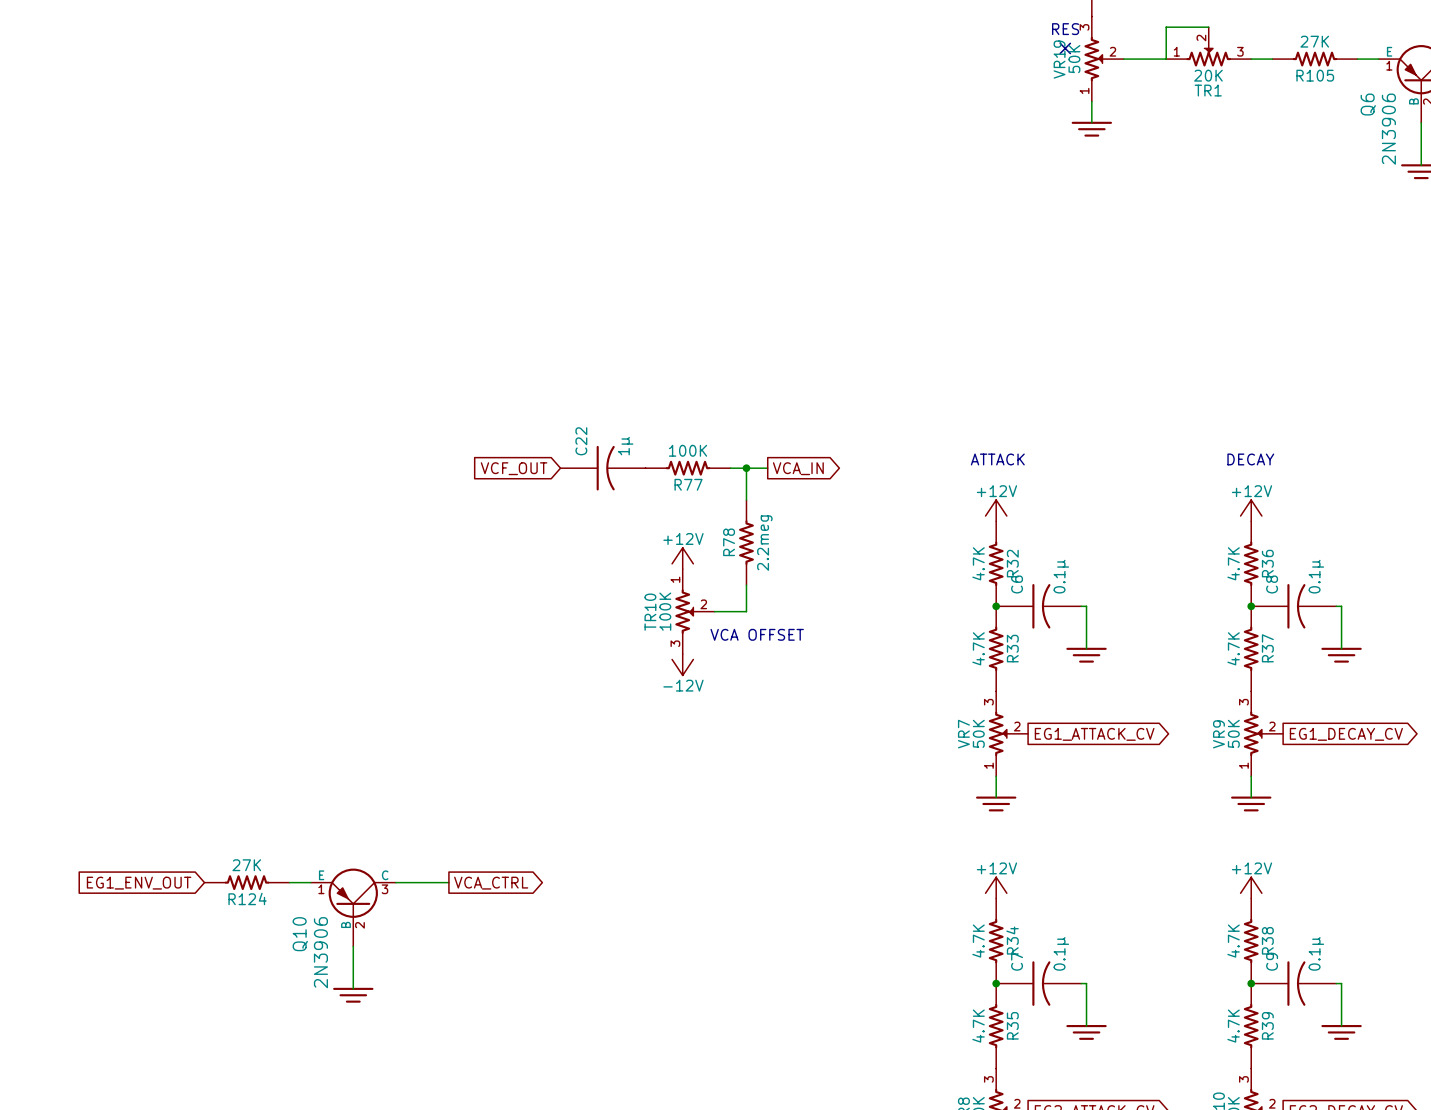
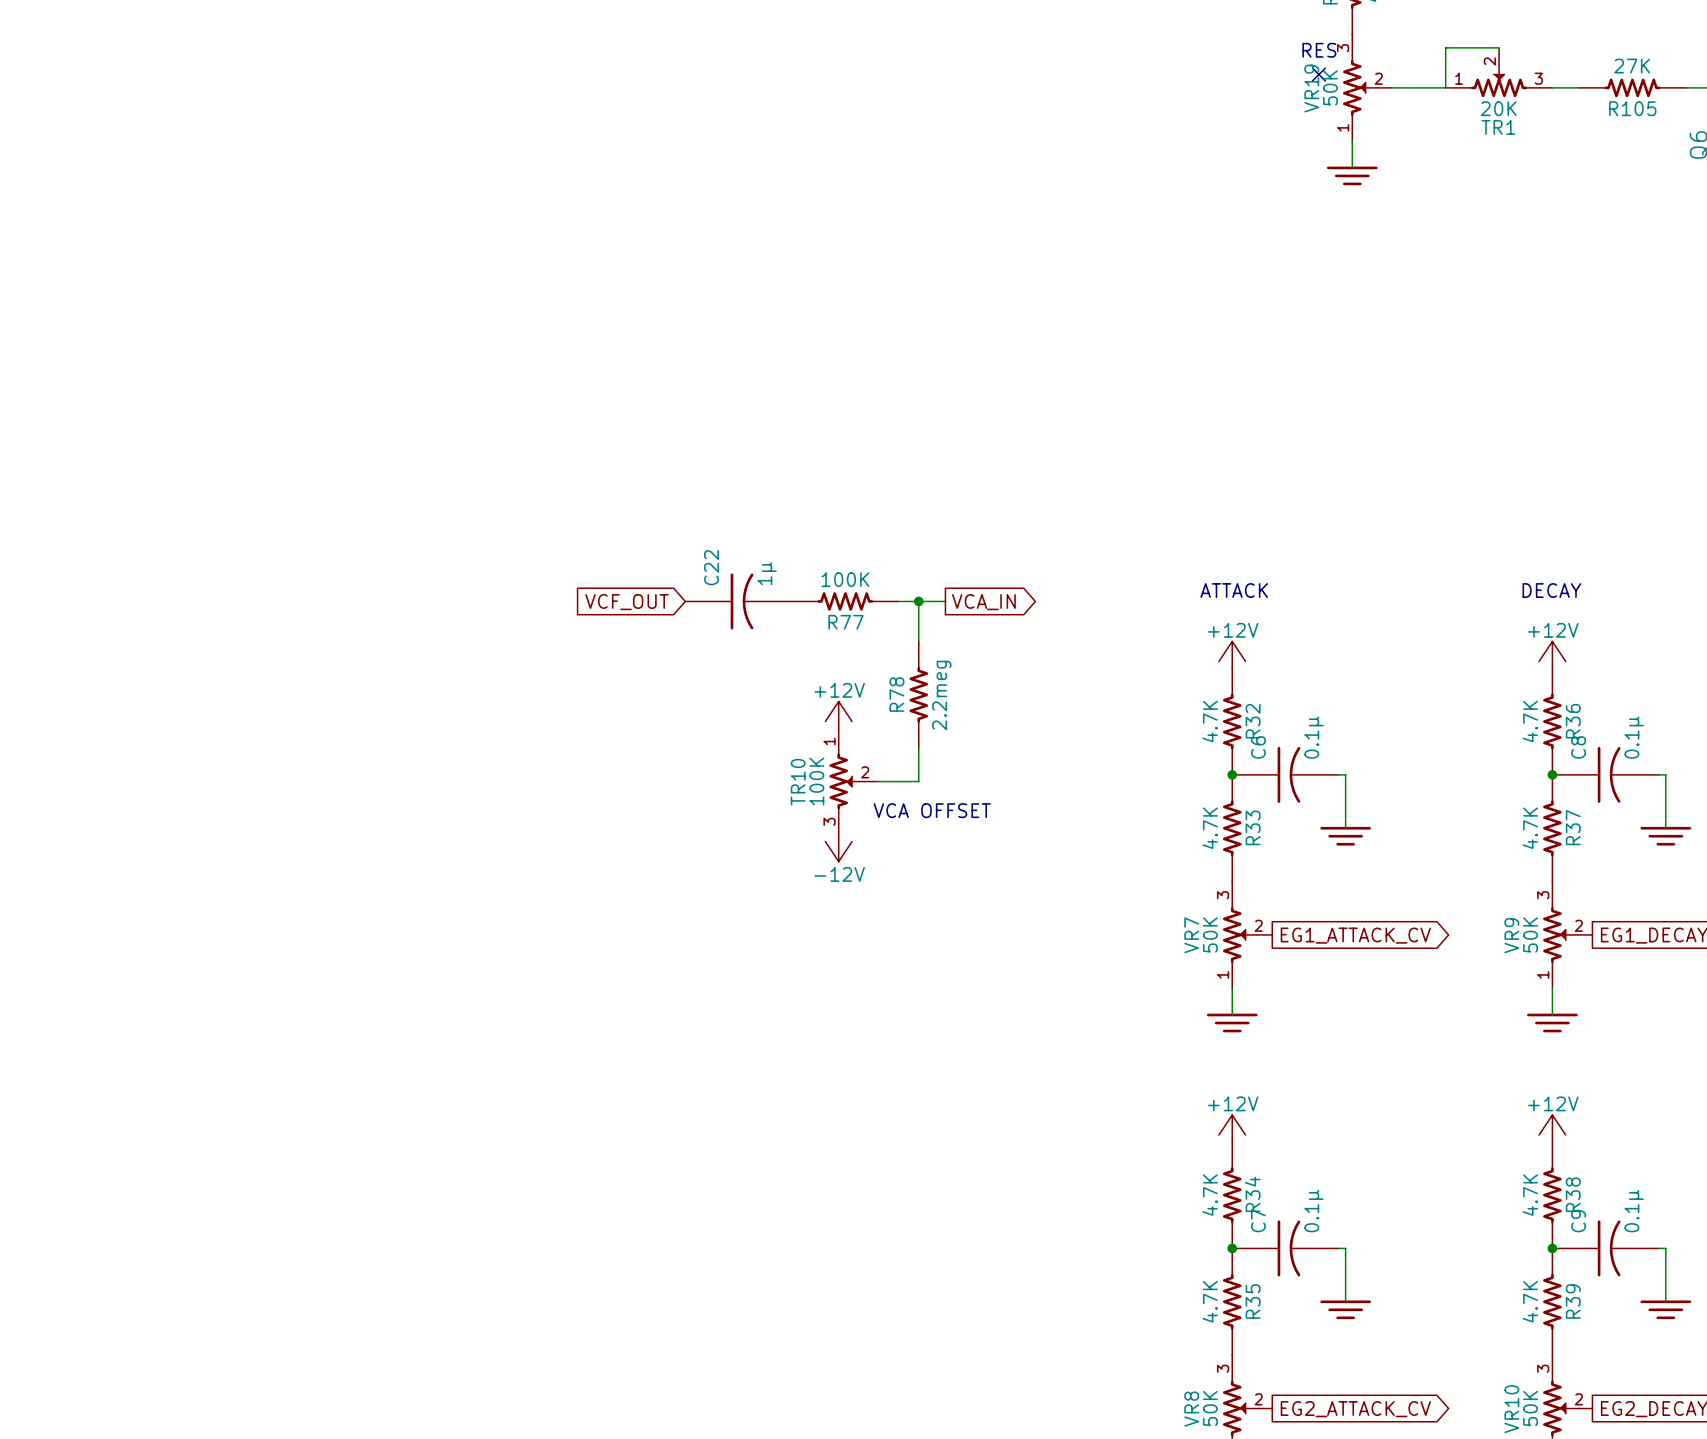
R124: 27K (247, 882) -> none
wire: (289, 882) (310, 882) -> none
wire: (395, 882) (448, 882) -> none
global label: EG1_ENV_OUT (139, 883) -> none
global label: VCA_CTRL (491, 883) -> none
Q10: 2N3906 (353, 907) -> none
wire: (353, 946) (353, 988) -> none
power symbol: (353, 995) -> none

